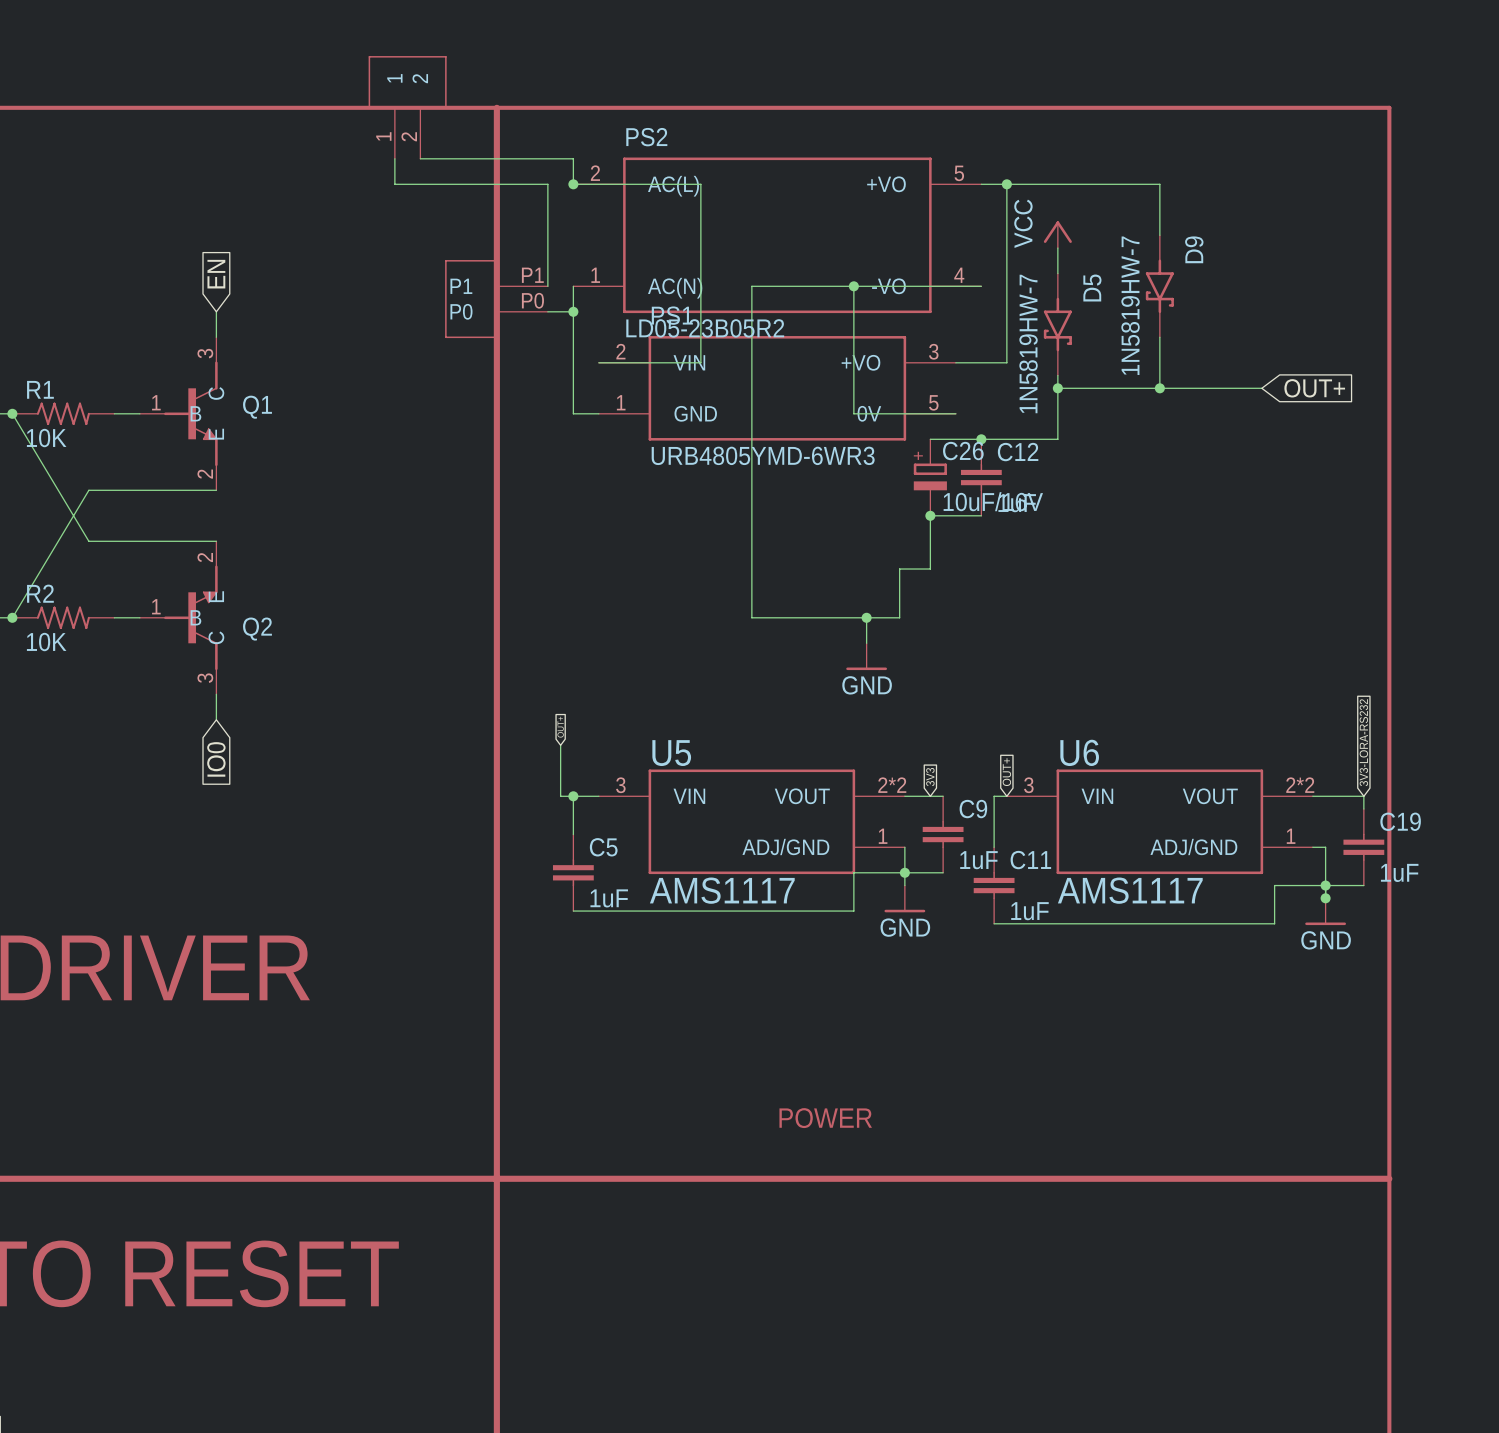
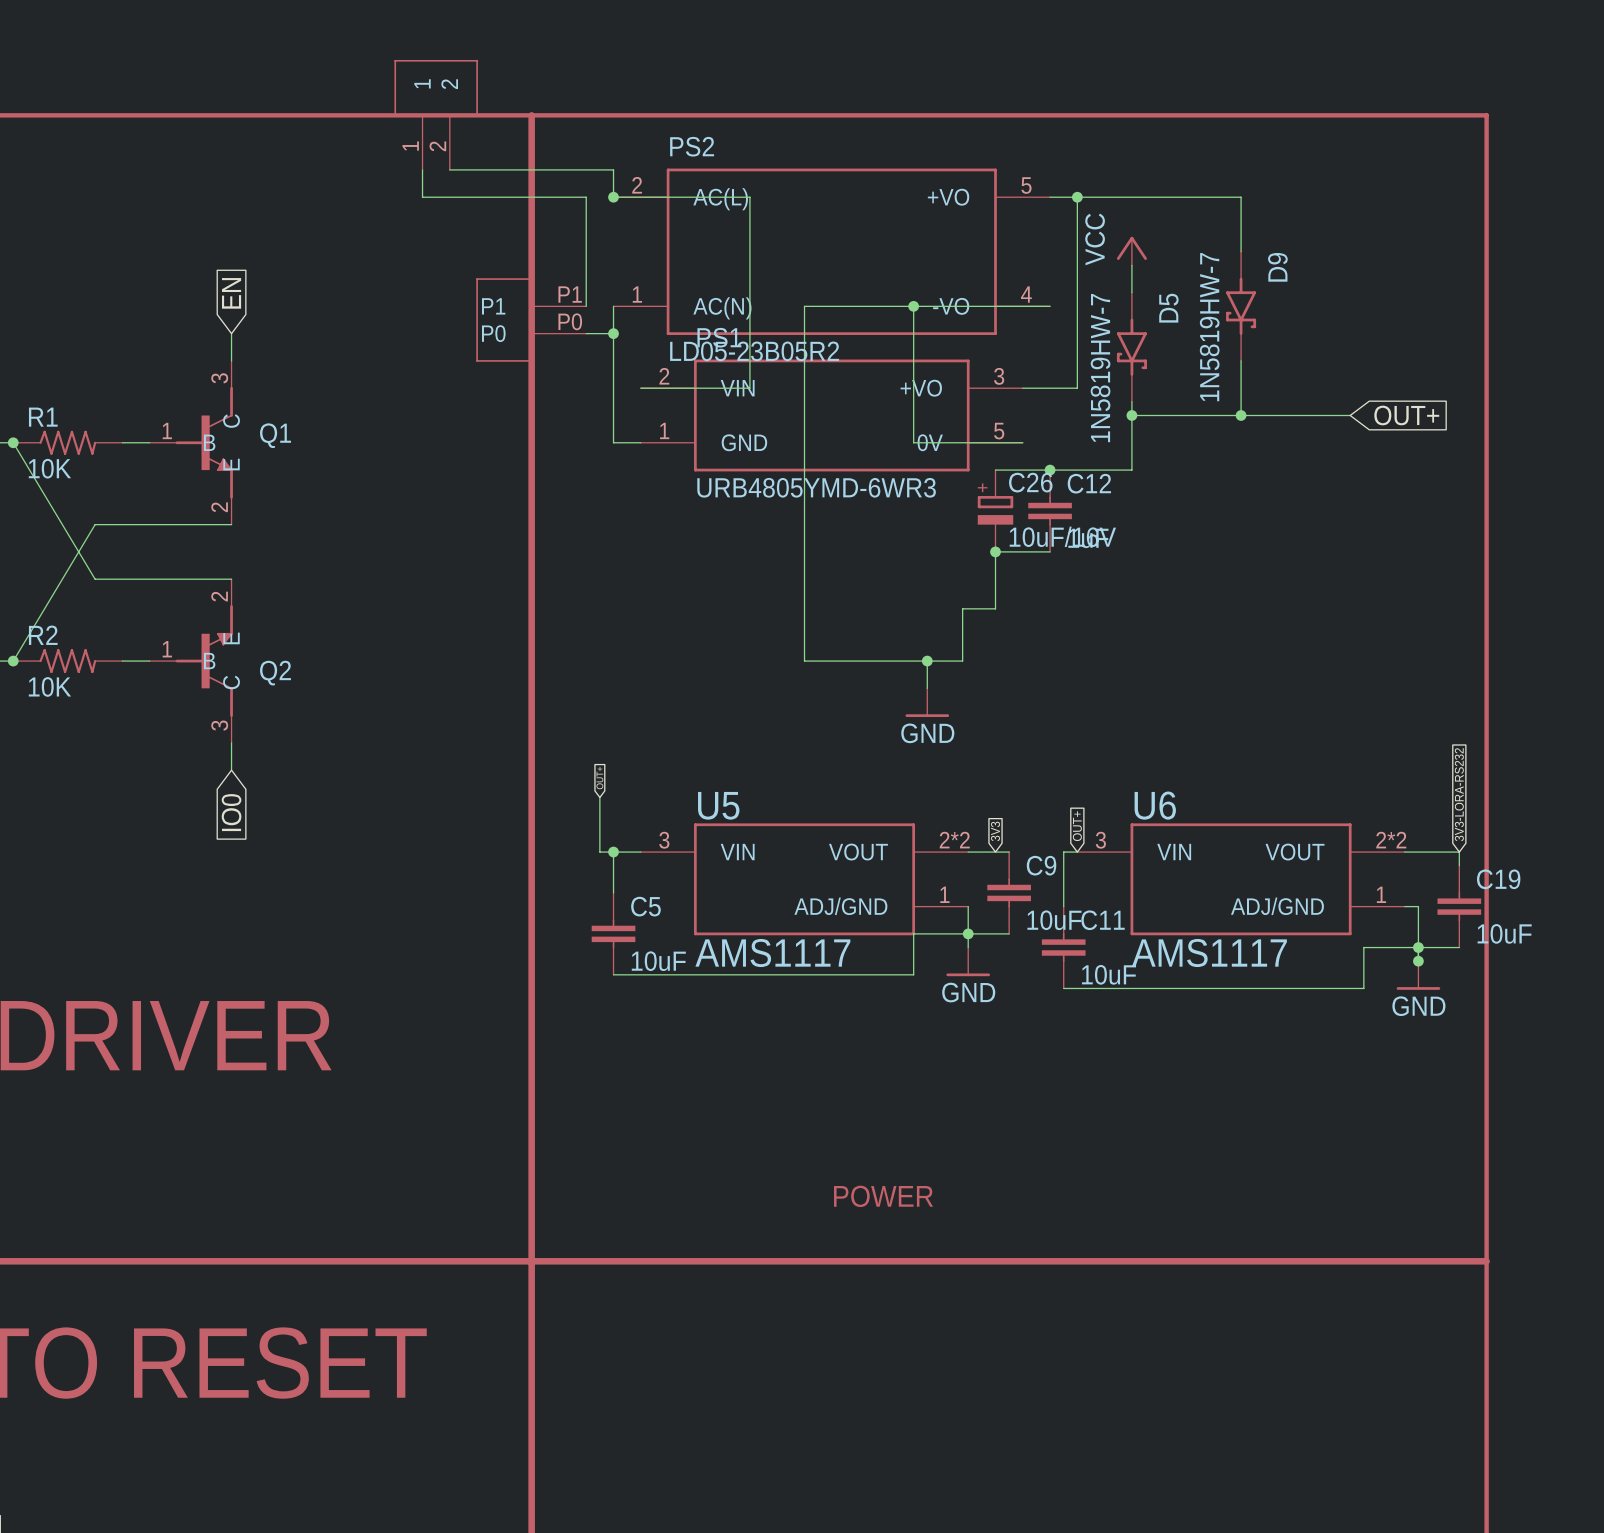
C9 value: 1uF (978, 860) -> 10uF (1054, 920)
C19 value: 1uF (1399, 872) -> 10uF (1504, 933)
C5 value: 1uF (609, 898) -> 10uF (658, 961)
C11 value: 1uF (1029, 911) -> 10uF (1109, 974)

